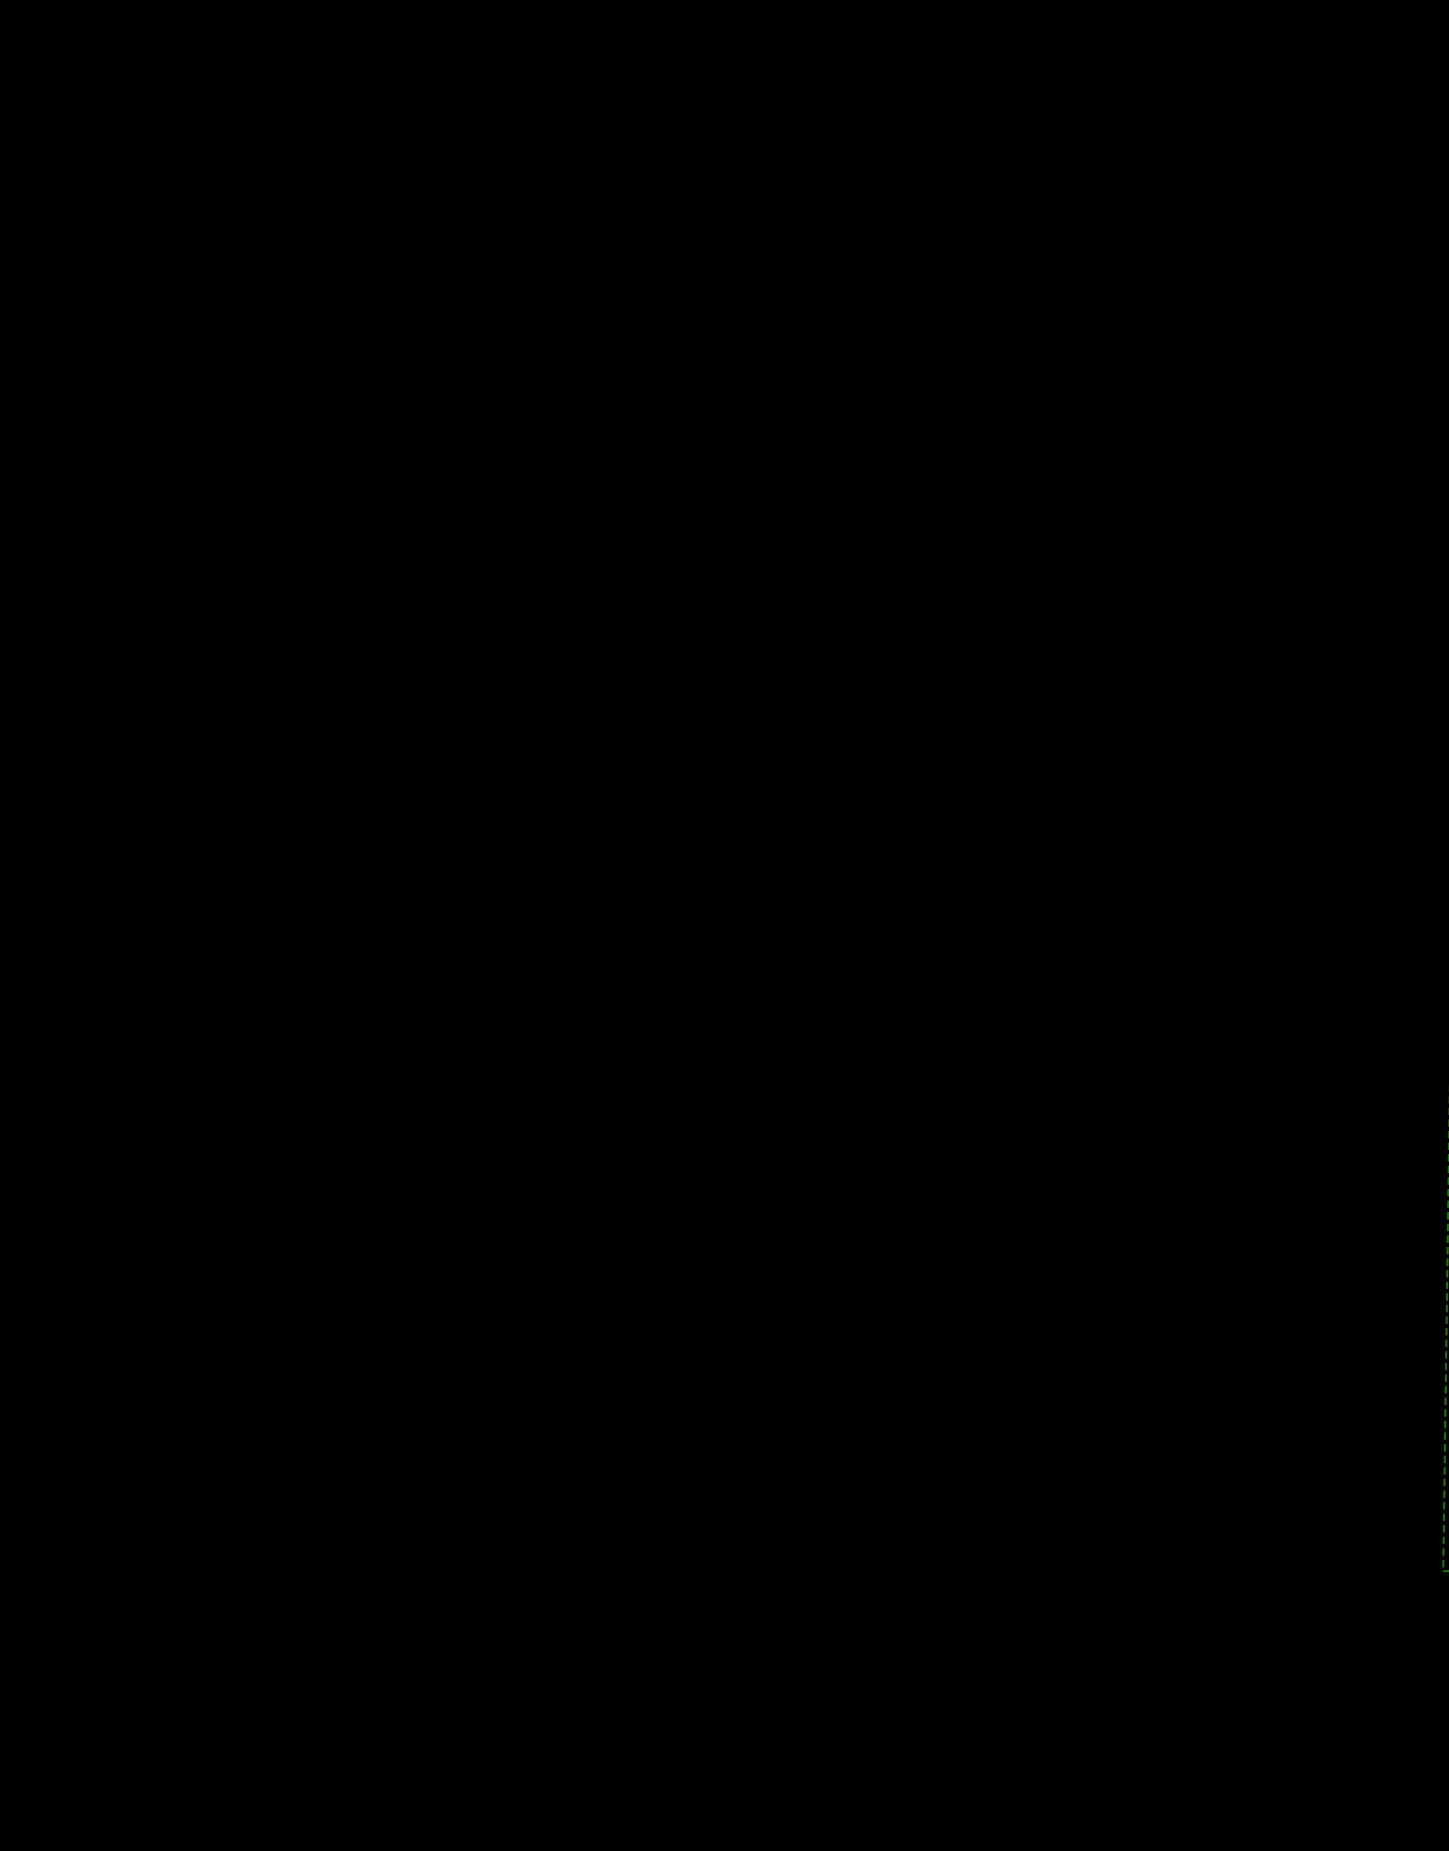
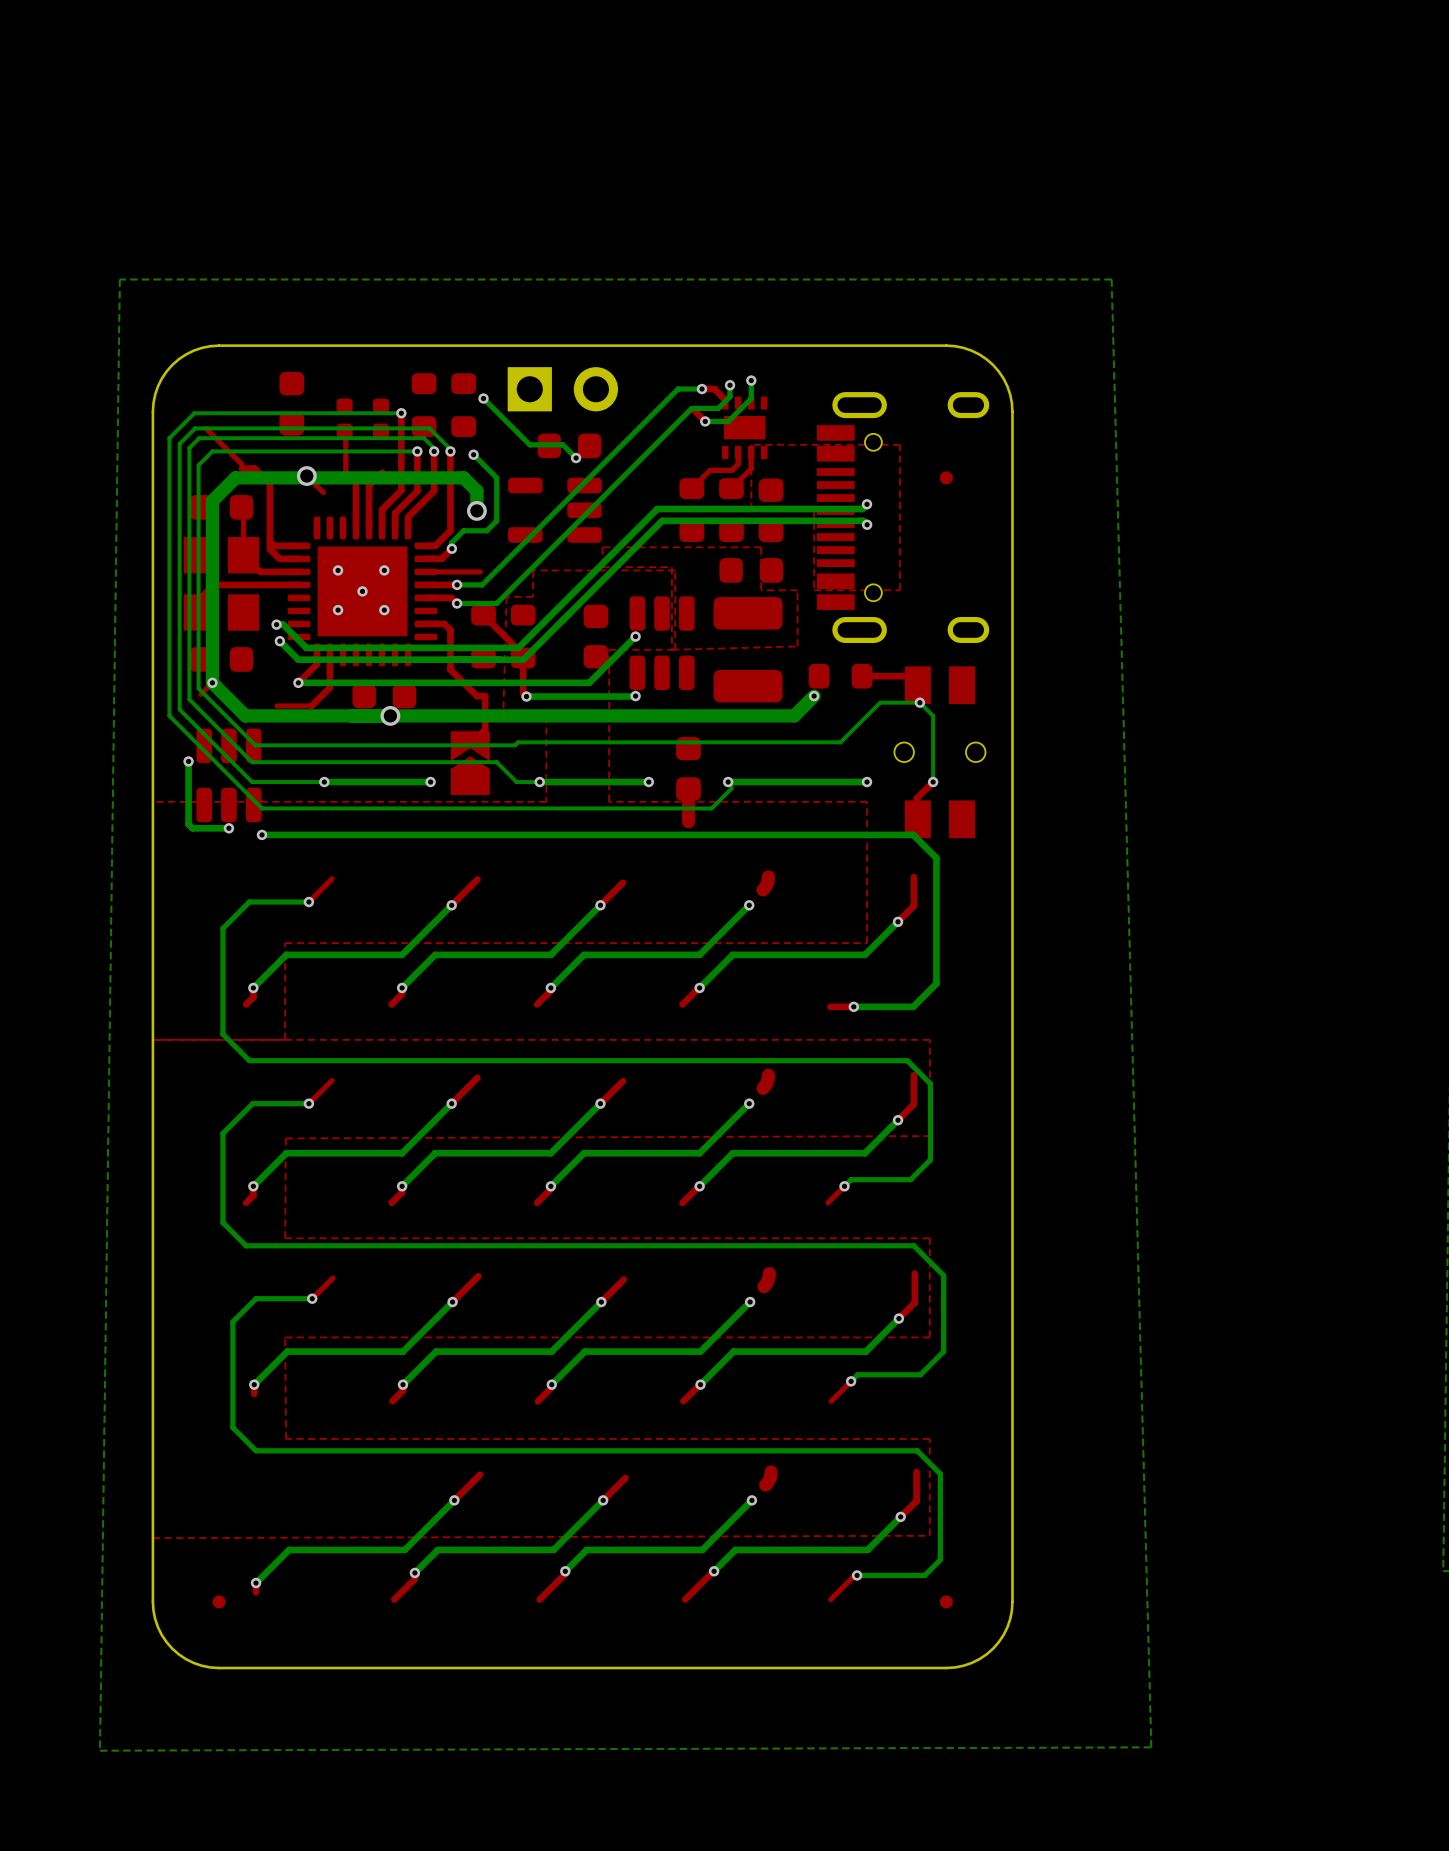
bottom zone outline: none -> (1111, 279) (1151, 1747) (100, 1750) (119, 279) (1111, 279)
board edge: none -> (946, 345) (219, 345) (201, 347) (185, 354) (172, 364) (161, 378) (155, 394) (152, 411) (152, 1601) (155, 1619) (161, 1634) (172, 1648) (185, 1659) (201, 1665) (219, 1668) (946, 1668) (963, 1665) (979, 1659) (993, 1648) (1003, 1634) (1010, 1619) (1012, 1601) (1012, 411) (1007, 386) (993, 364) (971, 350) (946, 345)
bottom track: none -> (751, 380) (751, 398) (728, 421) (705, 421)
via: none -> (751, 380)
bottom track: none -> (730, 385) (730, 396) (718, 408) (691, 408) (496, 603) (457, 603)
via: none -> (730, 385)
part: none -> (562, 389)
top track: none -> (702, 389) (714, 389) (725, 399) (725, 402)
bottom track: none -> (702, 389) (678, 389) (482, 584) (457, 584)
via: none -> (702, 389)
bottom track: none -> (483, 398) (529, 444) (562, 444) (576, 458)
via: none -> (483, 398)
part: none -> (291, 403)
part: none -> (424, 405)
part: none -> (463, 405)
top track: none -> (693, 409) (705, 421)
top track: none -> (401, 413) (401, 490) (382, 509) (382, 527)
via: none -> (401, 413)
bottom track: none -> (404, 413) (194, 413) (169, 438) (169, 715) (262, 808) (711, 808) (731, 788) (731, 782)
part: none -> (344, 418)
part: none -> (381, 418)
via: none -> (705, 421)
part: none -> (744, 427)
top track: none -> (205, 428) (241, 464)
top track: none -> (345, 434) (345, 472) (356, 482) (356, 527)
top zone outline: none -> (900, 444) (900, 590) (814, 590) (814, 510) (751, 510) (751, 444) (900, 444)
part: none -> (569, 445)
top track: none -> (417, 451) (417, 491) (395, 513) (395, 527)
bottom track: none -> (417, 451) (212, 451) (198, 465) (198, 688) (255, 745) (515, 745) (518, 742) (840, 742) (880, 702) (919, 702) (933, 715) (933, 782)
via: none -> (417, 451)
top track: none -> (434, 451) (434, 491) (408, 517) (408, 527)
bottom track: none -> (434, 451) (434, 448) (424, 438) (199, 438) (189, 447) (189, 699) (252, 762) (496, 762) (516, 782) (648, 782)
via: none -> (434, 451)
top track: none -> (450, 451) (450, 530) (435, 545) (425, 545)
bottom track: none -> (450, 451) (429, 428) (195, 428) (179, 443) (179, 709) (252, 782) (430, 782)
via: none -> (450, 451)
top track: none -> (738, 452) (738, 464) (731, 470) (710, 470) (691, 488)
top track: none -> (751, 452) (751, 468) (731, 488)
bottom track: none -> (473, 454) (496, 477) (496, 520) (486, 530) (463, 530) (451, 542) (451, 548)
via: none -> (473, 454)
via: none -> (576, 458)
top track: none -> (241, 468) (254, 468) (269, 483) (269, 549) (279, 558) (299, 558)
top track: none -> (382, 472) (369, 485) (369, 527)
top track: none -> (306, 476) (323, 492)
via: none -> (306, 476)
part: none -> (946, 477)
bottom track: none -> (867, 504) (862, 509) (657, 509) (518, 647) (306, 647) (283, 624) (276, 624)
via: none -> (867, 504)
part: none -> (221, 507)
top track: none -> (243, 509) (243, 555) (260, 571) (299, 571)
bottom track: none -> (476, 510) (476, 491) (463, 477) (235, 477) (212, 501) (212, 682) (245, 715) (794, 715) (814, 696)
via: none -> (476, 510)
part: none -> (554, 510)
part: none -> (691, 510)
part: none -> (731, 510)
part: none -> (771, 510)
part: none -> (903, 517)
bottom track: none -> (867, 524) (863, 520) (662, 520) (523, 659)
via: none -> (867, 524)
top track: none -> (269, 541) (274, 545) (299, 545)
top zone outline: none -> (761, 547) (761, 590) (797, 590) (797, 646) (671, 649) (671, 567) (602, 567) (602, 547) (761, 547)
top track: none -> (451, 548) (441, 558) (425, 558)
via: none -> (451, 548)
via: none -> (338, 570)
via: none -> (384, 570)
part: none -> (751, 570)
top track: none -> (480, 571) (425, 571)
part: none -> (221, 583)
top track: none -> (299, 584) (213, 584) (199, 599)
top track: none -> (457, 584) (425, 584)
via: none -> (457, 584)
part: none -> (362, 591)
via: none -> (362, 591)
top track: none -> (425, 597) (451, 597) (457, 603)
via: none -> (457, 603)
via: none -> (338, 610)
via: none -> (384, 610)
top track: none -> (483, 615) (523, 654)
top track: none -> (425, 623) (444, 623) (450, 629) (450, 669) (476, 696) (485, 696) (485, 729) (470, 744)
via: none -> (276, 624)
part: none -> (483, 636)
part: none -> (523, 636)
part: none -> (595, 636)
bottom track: none -> (635, 636) (589, 682) (298, 682)
via: none -> (635, 636)
bottom track: none -> (279, 641) (298, 659) (523, 659)
via: none -> (279, 641)
part: none -> (662, 643)
part: none -> (747, 649)
top track: none -> (316, 654) (316, 664) (298, 682)
top track: none -> (329, 654) (329, 687) (311, 705) (276, 705)
top track: none -> (523, 658) (523, 693) (526, 696)
part: none -> (221, 659)
part: none -> (840, 676)
top track: none -> (912, 676) (862, 676)
top track: none -> (212, 682) (200, 694)
via: none -> (212, 682)
via: none -> (298, 682)
part: none -> (384, 696)
via: none -> (526, 696)
bottom track: none -> (635, 696) (526, 696)
via: none -> (635, 696)
via: none -> (814, 696)
via: none -> (919, 702)
via: none -> (390, 715)
part: none -> (939, 752)
bottom track: none -> (188, 761) (188, 824) (192, 828) (228, 828)
via: none -> (188, 761)
part: none -> (470, 763)
part: none -> (688, 768)
part: none -> (228, 775)
via: none -> (324, 782)
via: none -> (430, 782)
via: none -> (539, 782)
via: none -> (648, 782)
via: none -> (728, 782)
bottom track: none -> (867, 782) (728, 782)
via: none -> (867, 782)
top track: none -> (933, 782) (916, 798) (916, 815)
via: none -> (933, 782)
top track: none -> (688, 788) (688, 821)
via: none -> (228, 828)
bottom track: none -> (262, 834) (913, 834) (936, 858) (936, 983) (913, 1006) (853, 1006)
via: none -> (262, 834)
top track: none -> (768, 876) (763, 889)
top track: none -> (913, 876) (913, 905) (898, 921)
top track: none -> (332, 878) (308, 902)
top track: none -> (477, 879) (451, 905)
top track: none -> (622, 882) (600, 905)
bottom track: none -> (308, 902) (249, 902) (222, 928) (222, 1034) (249, 1060) (907, 1060) (930, 1083) (930, 1159) (910, 1179) (851, 1179) (844, 1186)
via: none -> (308, 902)
bottom track: none -> (451, 905) (402, 954) (286, 954) (253, 987)
via: none -> (451, 905)
bottom track: none -> (600, 905) (550, 954) (435, 954) (402, 987)
via: none -> (600, 905)
bottom track: none -> (749, 905) (699, 954) (583, 954) (550, 987)
via: none -> (749, 905)
bottom track: none -> (898, 921) (864, 954) (732, 954) (699, 987)
via: none -> (898, 921)
top track: none -> (253, 987) (253, 997) (246, 1004)
via: none -> (253, 987)
top track: none -> (402, 987) (402, 993) (391, 1004)
via: none -> (402, 987)
top track: none -> (550, 987) (550, 990) (537, 1004)
via: none -> (550, 987)
top track: none -> (699, 987) (682, 1004)
via: none -> (699, 987)
top track: none -> (853, 1006) (830, 1006)
via: none -> (853, 1006)
top zone outline: none -> (285, 1039) (285, 943) (867, 943) (867, 801) (609, 801) (609, 649) (675, 649) (675, 570) (533, 570) (533, 596) (506, 596) (503, 712) (546, 715) (546, 801) (152, 801) (152, 1538) (929, 1535) (929, 1438) (286, 1438) (285, 1337) (929, 1337) (929, 1238) (285, 1238) (285, 1138) (930, 1136) (929, 1039) (152, 1039)
top track: none -> (768, 1075) (763, 1088)
top track: none -> (913, 1075) (913, 1104) (898, 1120)
top track: none -> (477, 1077) (451, 1103)
top track: none -> (332, 1080) (308, 1103)
top track: none -> (622, 1081) (600, 1103)
bottom track: none -> (308, 1103) (252, 1103) (222, 1133) (222, 1222) (246, 1245) (913, 1245) (943, 1275) (943, 1351) (920, 1374) (857, 1374) (851, 1381)
via: none -> (308, 1103)
bottom track: none -> (451, 1103) (402, 1153) (286, 1153) (253, 1186)
via: none -> (451, 1103)
bottom track: none -> (600, 1103) (550, 1153) (435, 1153) (402, 1186)
via: none -> (600, 1103)
bottom track: none -> (749, 1103) (699, 1153) (583, 1153) (550, 1186)
via: none -> (749, 1103)
bottom track: none -> (898, 1120) (864, 1153) (732, 1153) (699, 1186)
via: none -> (898, 1120)
top track: none -> (253, 1186) (253, 1195) (246, 1202)
via: none -> (253, 1186)
top track: none -> (402, 1186) (402, 1192) (391, 1202)
via: none -> (402, 1186)
top track: none -> (550, 1186) (550, 1189) (537, 1202)
via: none -> (550, 1186)
top track: none -> (699, 1186) (682, 1202)
via: none -> (699, 1186)
top track: none -> (844, 1186) (827, 1202)
via: none -> (844, 1186)
top track: none -> (769, 1273) (763, 1286)
top track: none -> (914, 1273) (914, 1302) (898, 1318)
top track: none -> (478, 1276) (452, 1302)
top track: none -> (332, 1278) (312, 1298)
top track: none -> (623, 1279) (601, 1302)
bottom track: none -> (312, 1298) (256, 1298) (232, 1321) (232, 1427) (256, 1450) (917, 1450) (940, 1473) (940, 1559) (924, 1575) (857, 1575)
via: none -> (312, 1298)
bottom track: none -> (452, 1302) (403, 1351) (287, 1351) (254, 1384)
via: none -> (452, 1302)
bottom track: none -> (601, 1302) (551, 1351) (436, 1351) (403, 1384)
via: none -> (601, 1302)
bottom track: none -> (750, 1302) (700, 1351) (584, 1351) (551, 1384)
via: none -> (750, 1302)
bottom track: none -> (898, 1318) (865, 1351) (733, 1351) (700, 1384)
via: none -> (898, 1318)
top track: none -> (851, 1381) (831, 1401)
via: none -> (851, 1381)
top track: none -> (254, 1384) (254, 1393)
via: none -> (254, 1384)
top track: none -> (403, 1384) (403, 1390) (392, 1401)
via: none -> (403, 1384)
top track: none -> (551, 1384) (551, 1387) (537, 1401)
via: none -> (551, 1384)
top track: none -> (700, 1384) (683, 1401)
via: none -> (700, 1384)
top track: none -> (771, 1472) (765, 1484)
top track: none -> (916, 1472) (916, 1501) (900, 1516)
top track: none -> (480, 1474) (454, 1500)
top track: none -> (625, 1477) (603, 1500)
bottom track: none -> (454, 1500) (404, 1549) (289, 1549) (256, 1583)
via: none -> (454, 1500)
bottom track: none -> (603, 1500) (553, 1549) (437, 1549) (414, 1572)
via: none -> (603, 1500)
bottom track: none -> (751, 1500) (702, 1549) (586, 1549) (565, 1571)
via: none -> (751, 1500)
bottom track: none -> (900, 1516) (867, 1549) (735, 1549) (714, 1571)
via: none -> (900, 1516)
top track: none -> (565, 1571) (565, 1574) (539, 1599)
via: none -> (565, 1571)
top track: none -> (714, 1571) (685, 1599)
via: none -> (714, 1571)
top track: none -> (414, 1572) (414, 1578) (394, 1599)
via: none -> (414, 1572)
top track: none -> (857, 1575) (854, 1575) (830, 1599)
via: none -> (857, 1575)
top track: none -> (256, 1583) (256, 1592)
via: none -> (256, 1583)
part: none -> (219, 1601)
part: none -> (946, 1601)

